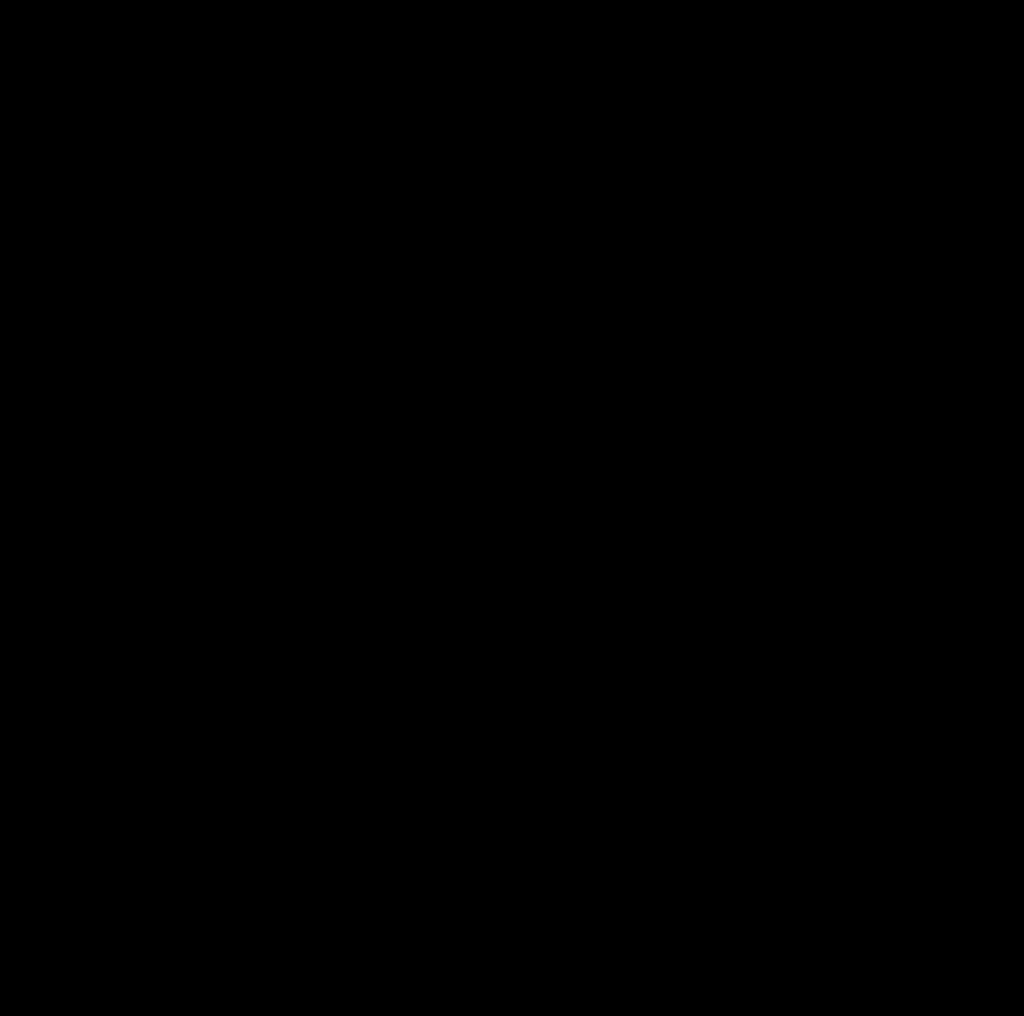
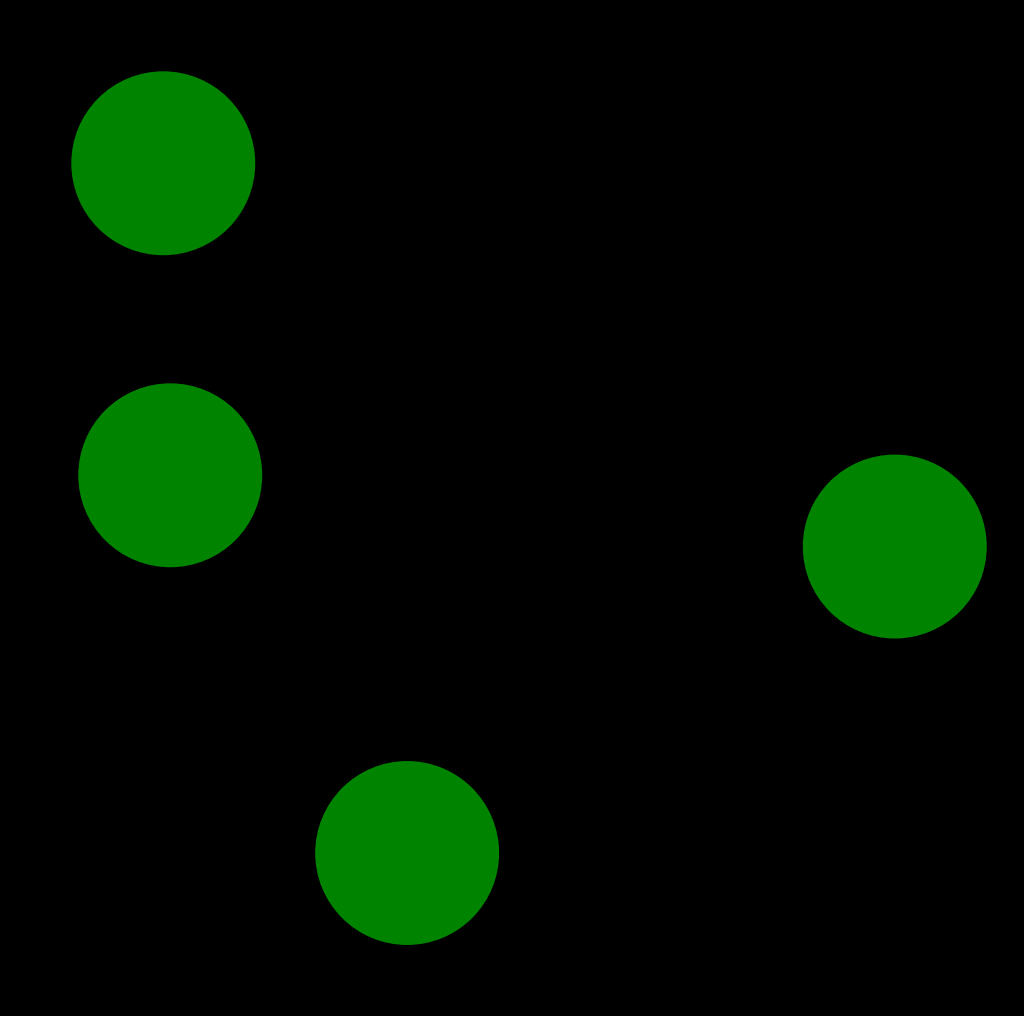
part: none -> (163, 163)
part: none -> (170, 475)
part: none -> (894, 546)
part: none -> (407, 853)

